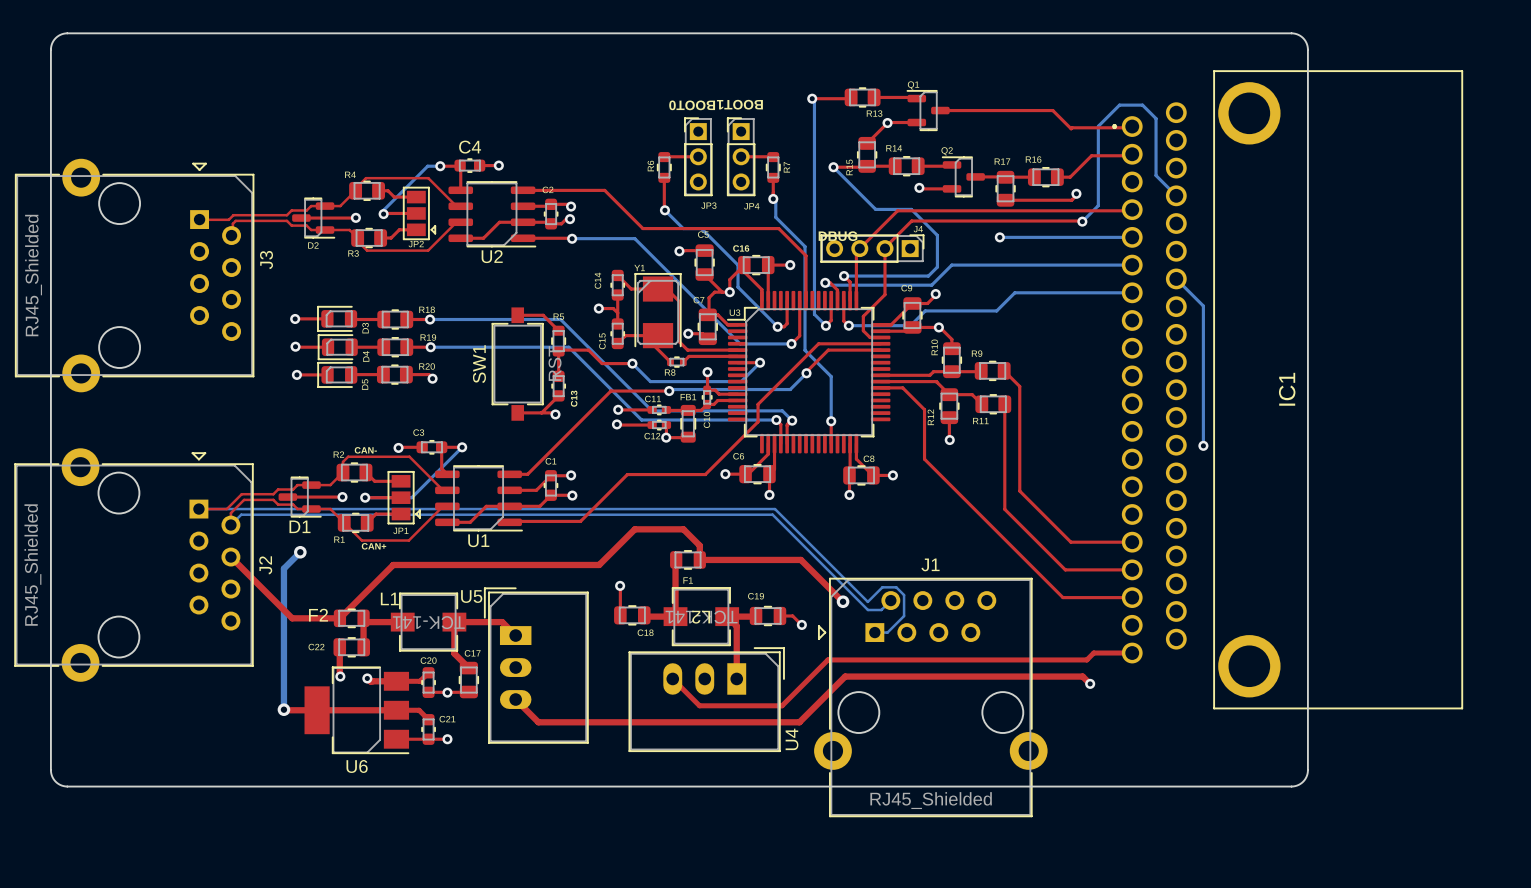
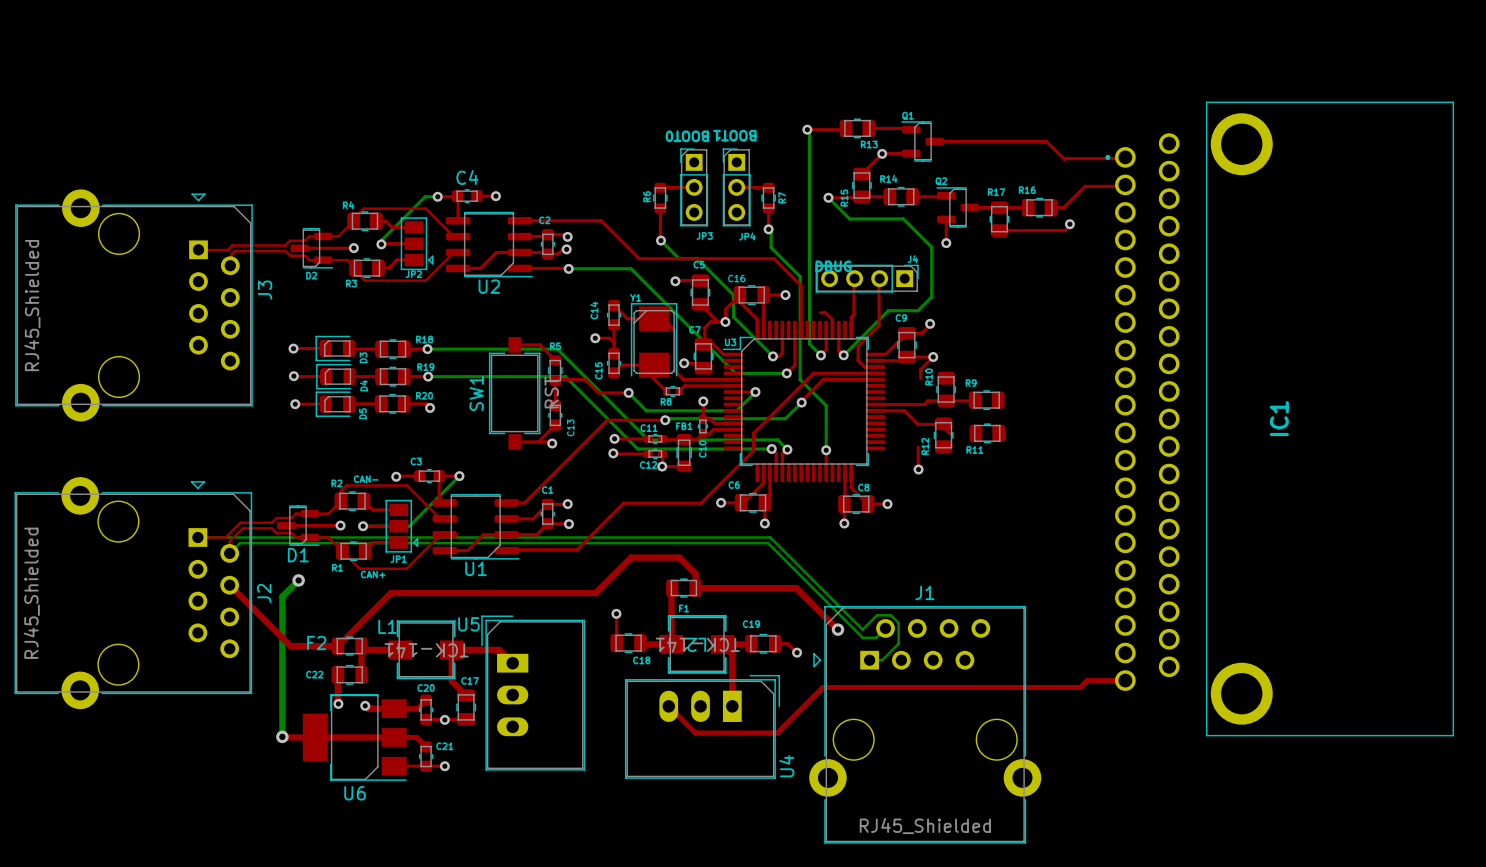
board edge: (67, 33) (1291, 33) (1300, 35) (1305, 41) (1307, 49) (1307, 770) (1305, 778) (1300, 784) (1291, 786) (67, 786) (58, 784) (53, 778) (50, 770) (50, 49) (55, 38) (67, 33) -> none
top track: (919, 187) (952, 188) -> (946, 243) (946, 219)
via: (919, 187) -> none
bottom track: (854, 188) (875, 209) (911, 209) (937, 235) -> (849, 218) (903, 218) (931, 247) (931, 265)
bottom track: (1176, 195) (1156, 175) (1156, 118) (1142, 105) (1119, 105) (1098, 126) (1098, 205) (1082, 221) -> none
top track: (1132, 209) (897, 210) (856, 251) (856, 287) -> (854, 287) (854, 314) (851, 317)
via: none -> (946, 243)
top track: (1081, 221) (911, 221) (884, 247) (884, 294) (863, 316) -> (879, 287) (879, 325) (858, 346)
via: (1082, 221) -> none
bottom track: (999, 237) (1132, 237) -> none
via: (999, 237) -> none
bottom track: (1132, 265) (951, 265) (931, 285) (827, 285) (825, 282) -> none
top track: (844, 276) (850, 282) (850, 300) -> none
bottom track: (844, 276) (928, 276) -> (843, 355) (888, 310) (918, 310) (922, 305)
via: (844, 276) -> none
bottom track: (1176, 278) (1203, 306) (1203, 445) -> none
via: (825, 282) -> none
bottom track: (1132, 292) (1014, 292) (996, 310) (925, 310) (910, 325) (848, 325) -> none
top track: (938, 327) (951, 339) (951, 348) -> (933, 357) (920, 369) (920, 378)
top track: (1004, 370) (1019, 386) (1019, 491) (1070, 542) (1132, 542) -> none
top track: (910, 381) (936, 381) (949, 394) (972, 394) (981, 404) -> (904, 410) (918, 424) (940, 424) (950, 433)
top track: (880, 387) (902, 387) (924, 409) (924, 459) (1062, 597) (1132, 597) -> none
top track: (1004, 404) (1004, 509) (1065, 569) (1132, 569) -> none
top track: (949, 417) (949, 440) -> (918, 447) (918, 469)
via position: (949, 440) -> (918, 469)
via: (1203, 445) -> none
via: (1090, 683) -> none
top track: (1090, 684) (1082, 676) (845, 676) (799, 722) (538, 722) (515, 699) -> none

